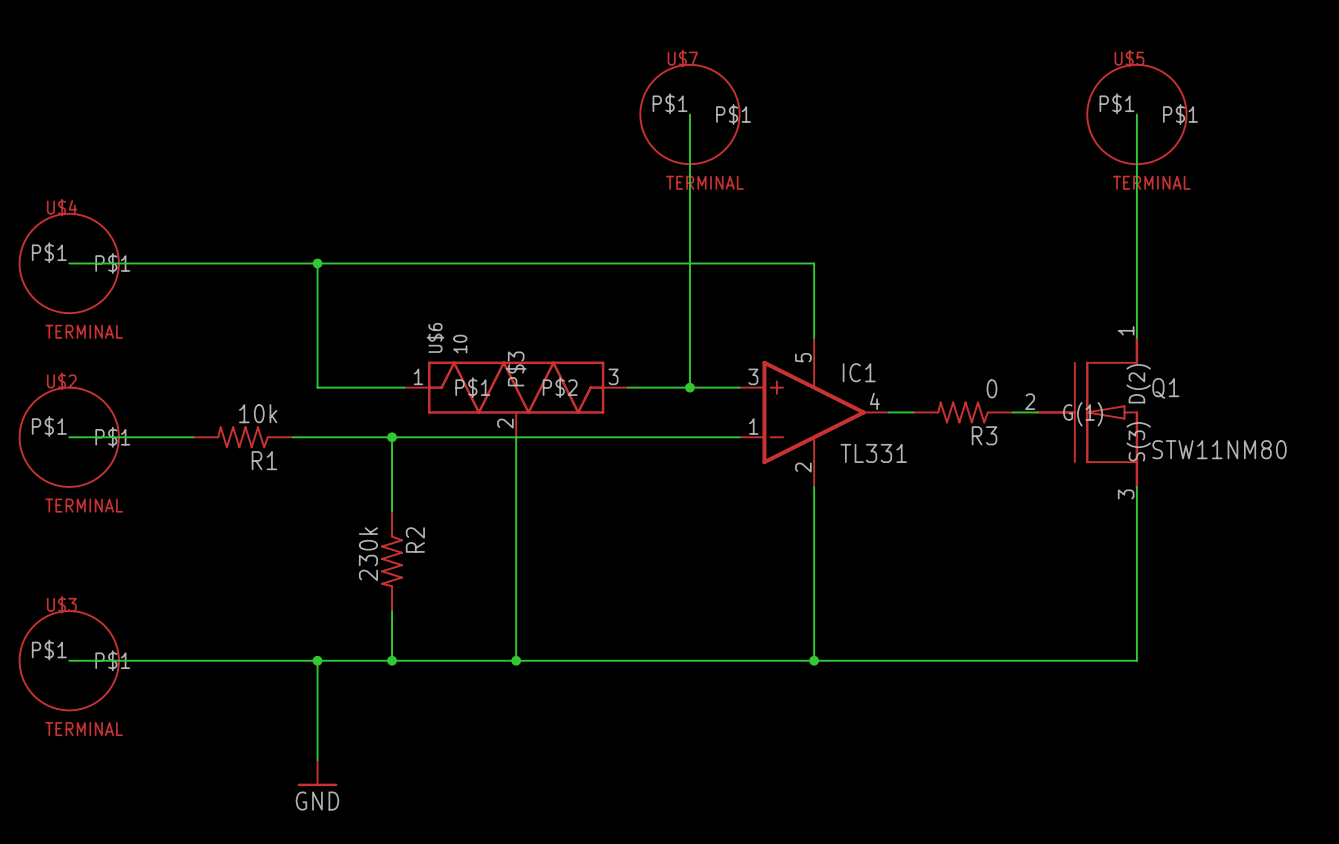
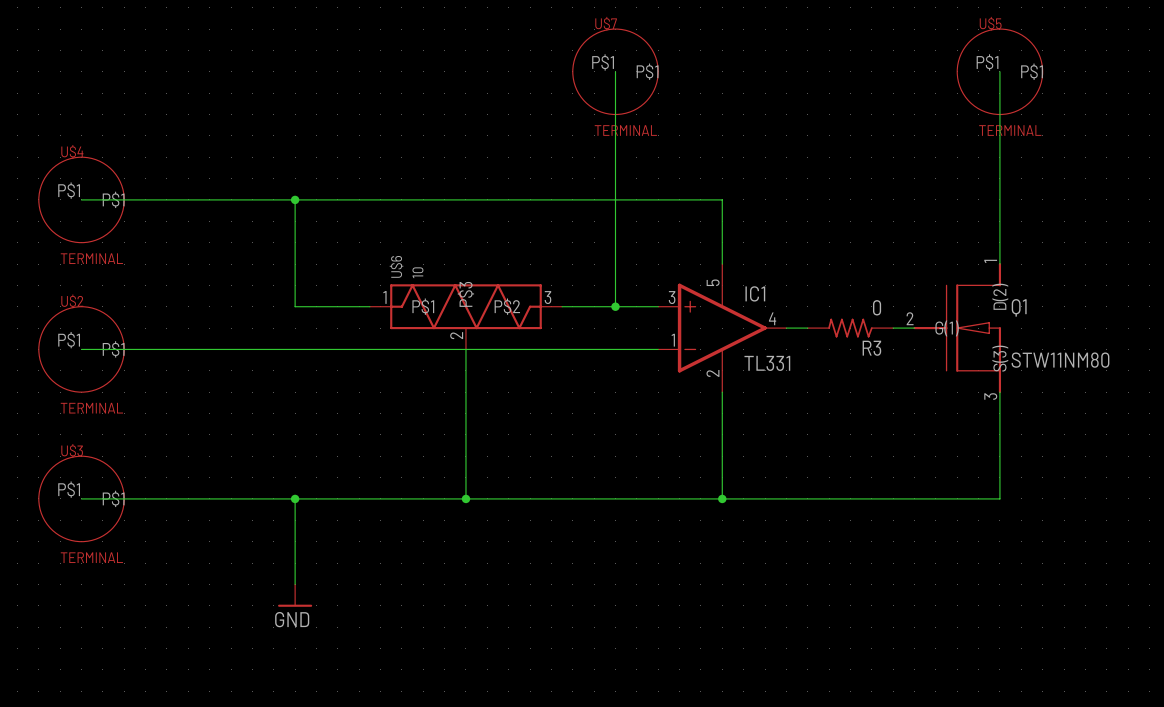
R1: 10k (243, 437) -> none
wire: (392, 437) (392, 511) -> none
junction: (392, 437) -> none
R2: 230k (392, 561) -> none
junction: none -> (295, 498)
wire: (392, 611) (392, 660) -> (295, 498) (295, 541)
wire: (516, 611) (516, 660) -> none
wire: (814, 611) (814, 660) -> none
wire: (1136, 611) (1136, 660) (69, 660) -> (999, 498) (81, 498)
U$3 position: (69, 660) -> (81, 498)
junction: (317, 660) -> none
junction: (392, 660) -> none
junction position: (516, 660) -> (465, 498)
junction position: (814, 660) -> (722, 498)
power symbol position: GND (317, 773) -> GND (295, 595)

